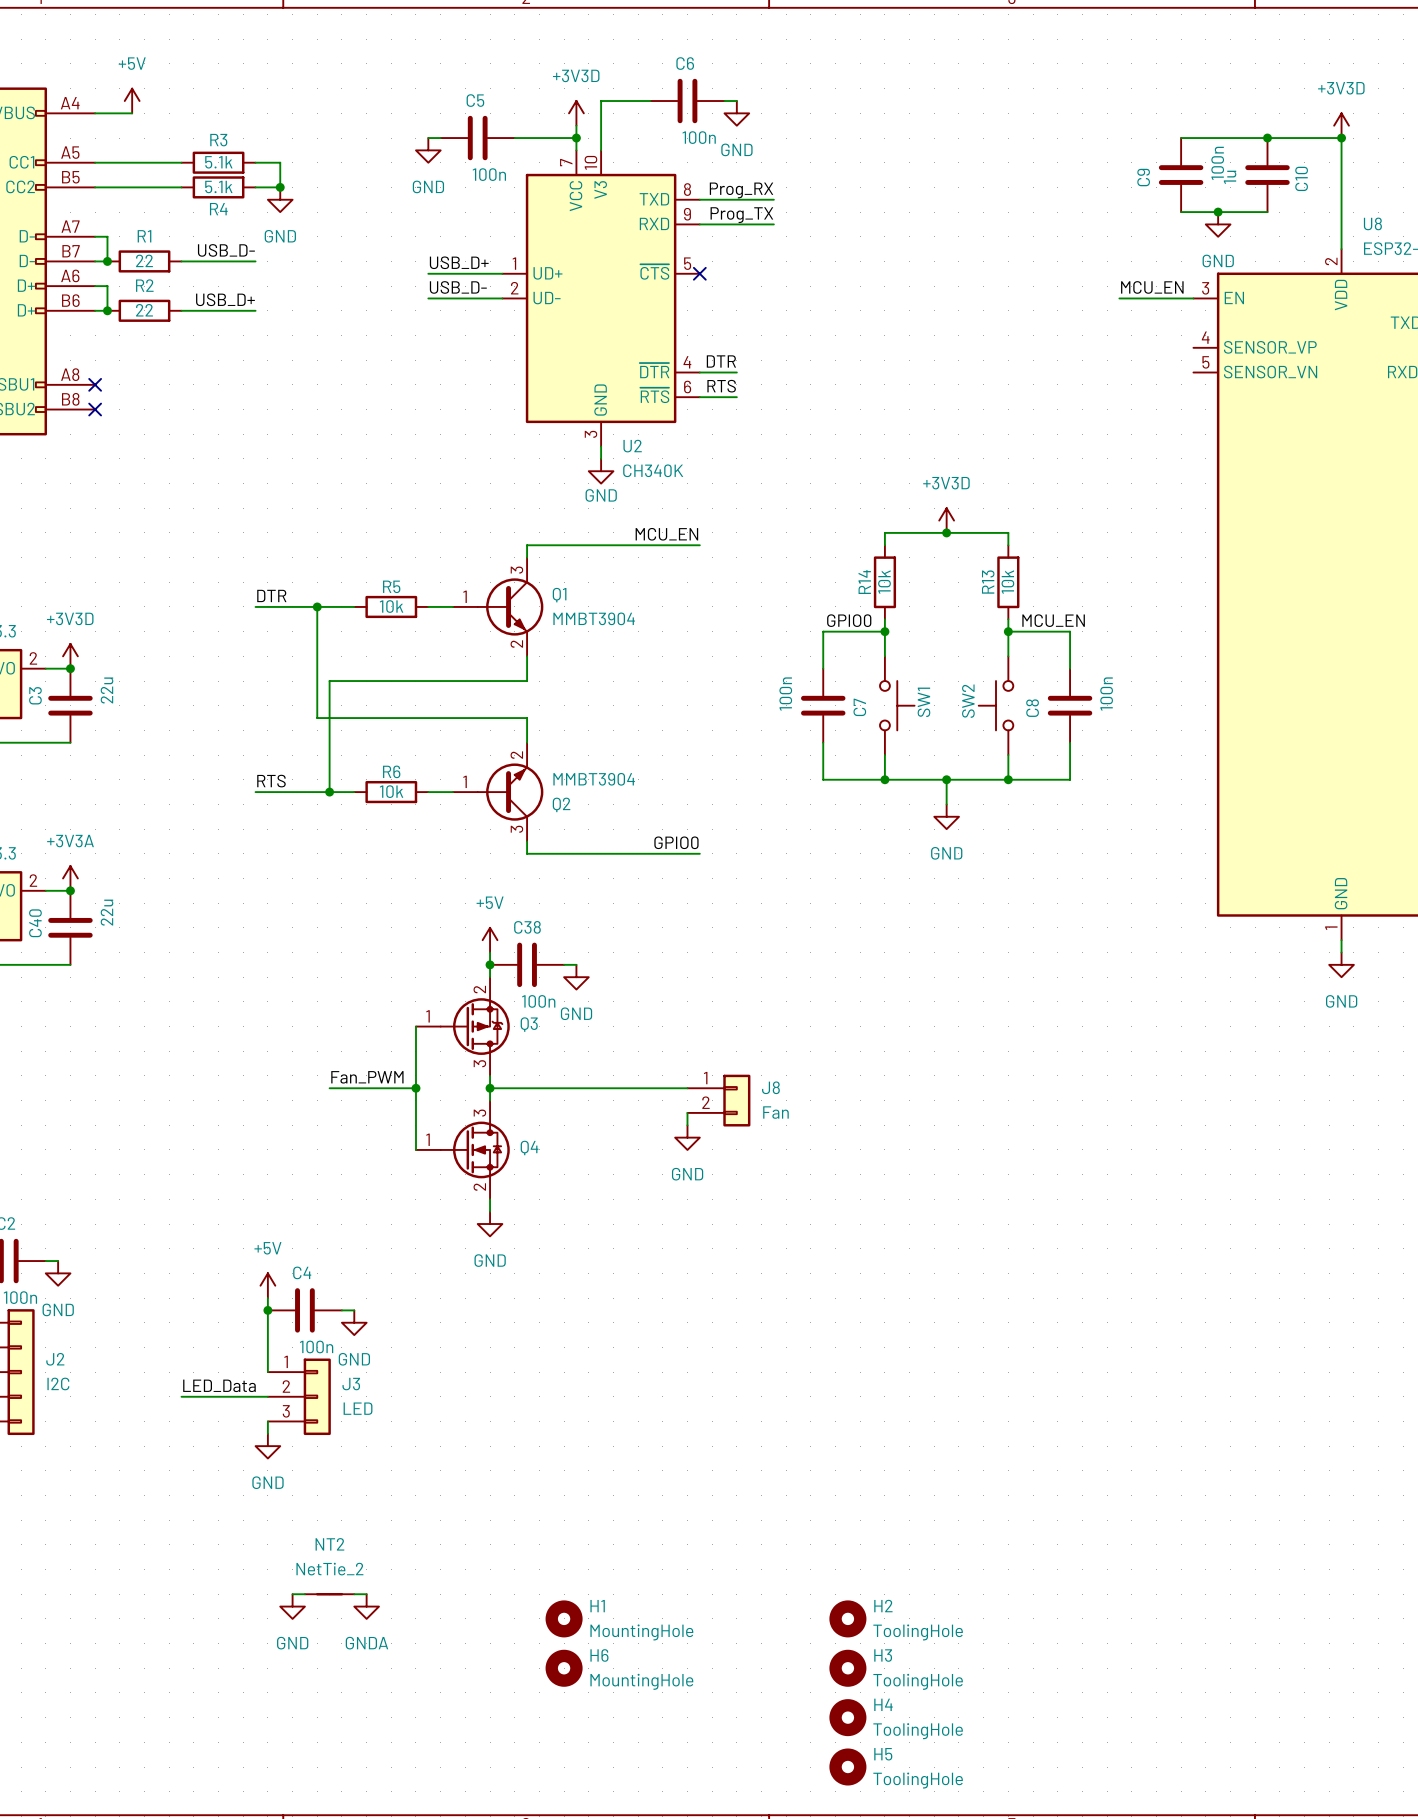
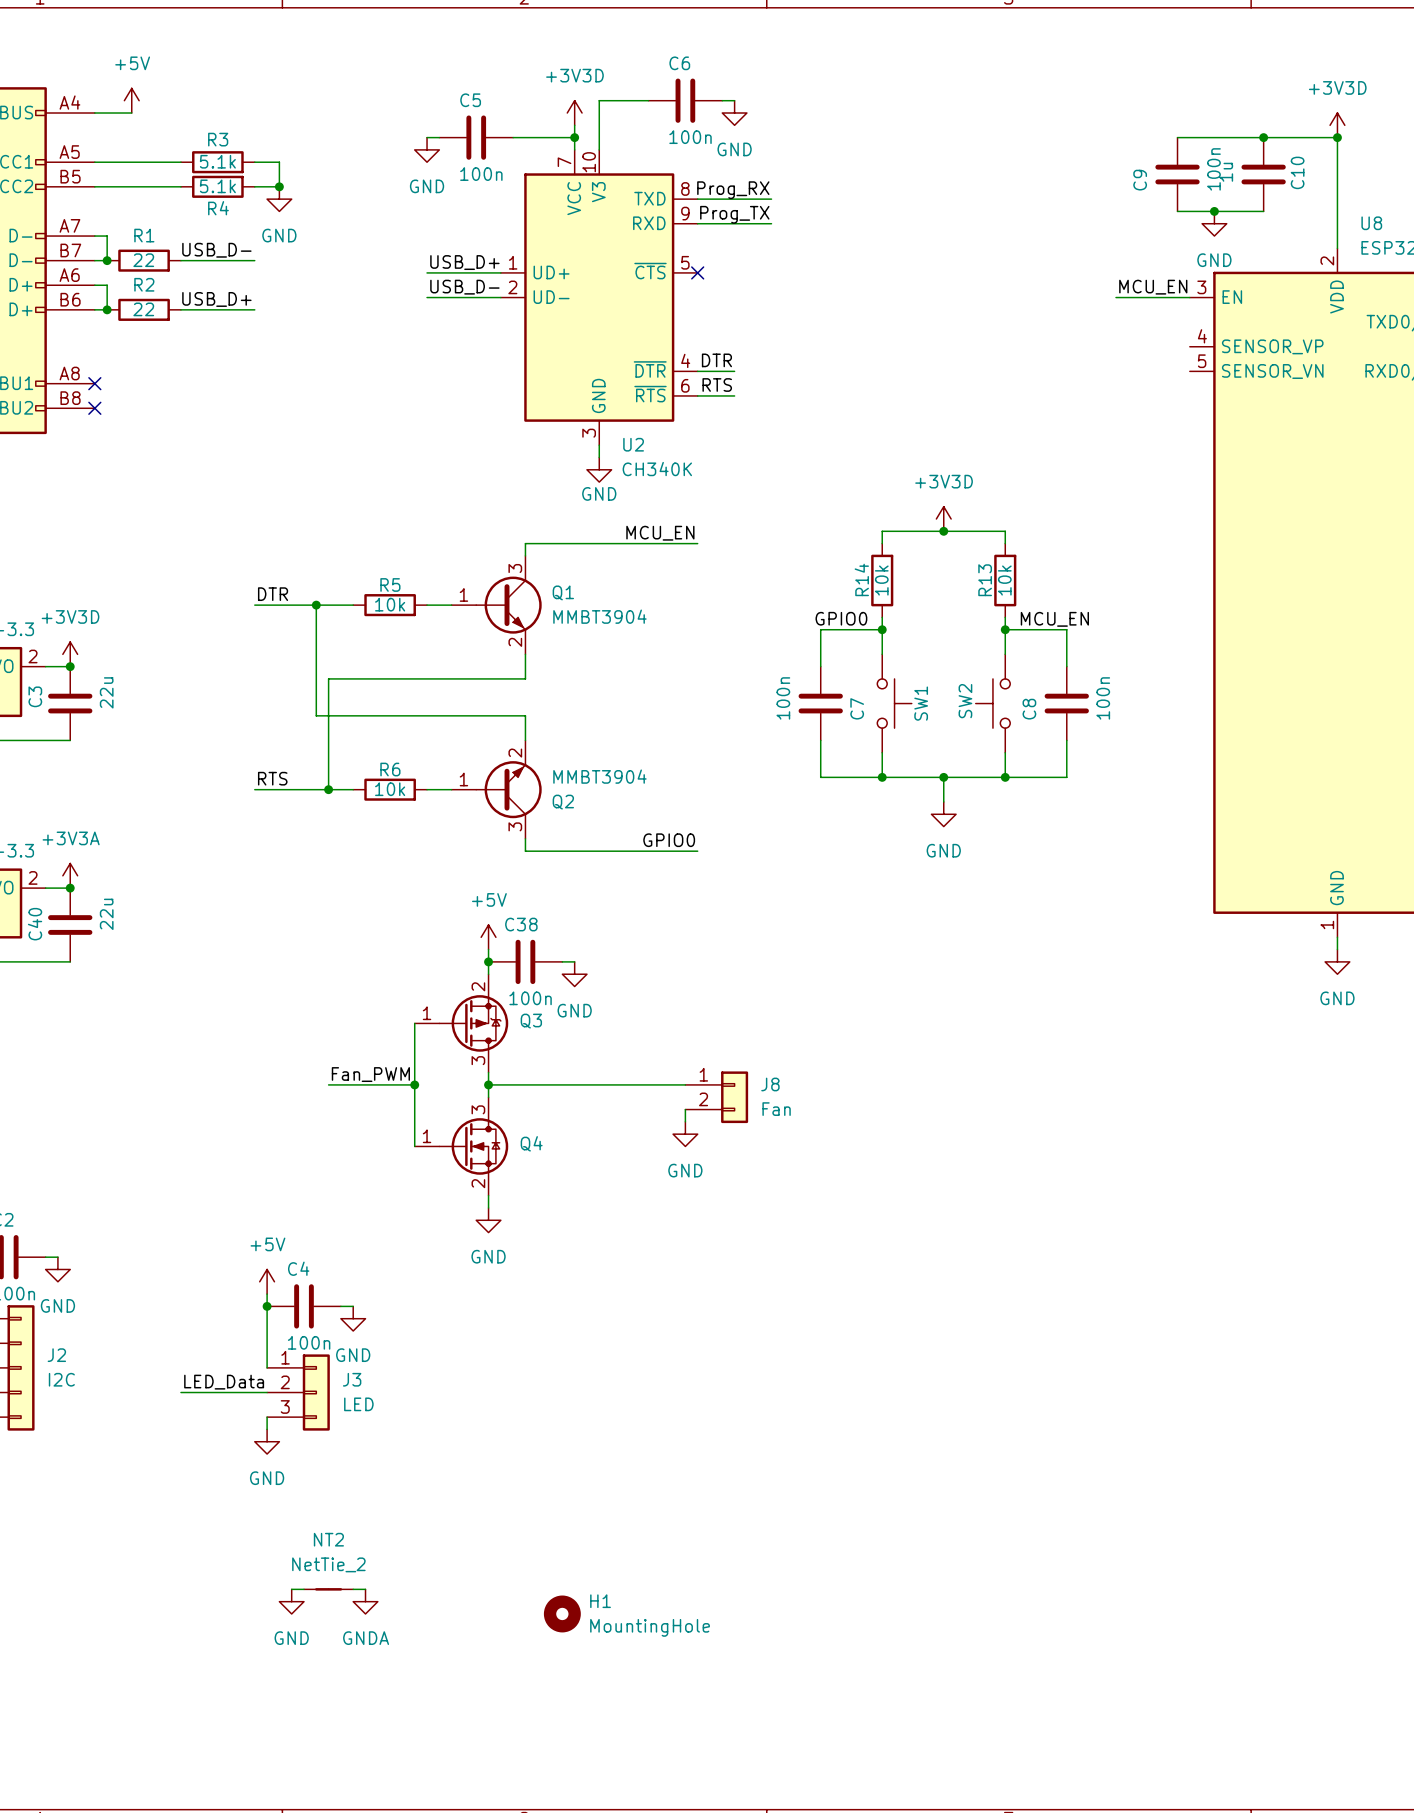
H2: ToolingHole (847, 1618) -> none
H6: MountingHole (564, 1668) -> none
H3: ToolingHole (847, 1668) -> none
H4: ToolingHole (847, 1717) -> none
H5: ToolingHole (847, 1767) -> none

